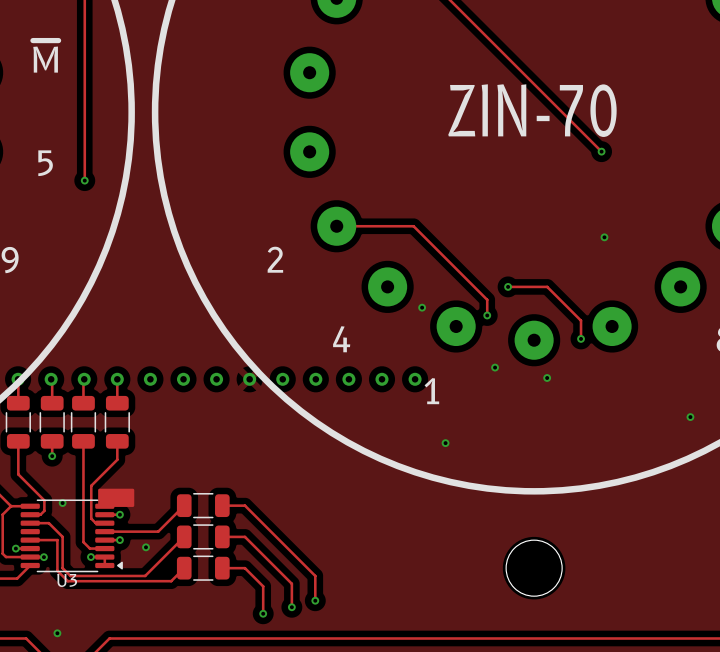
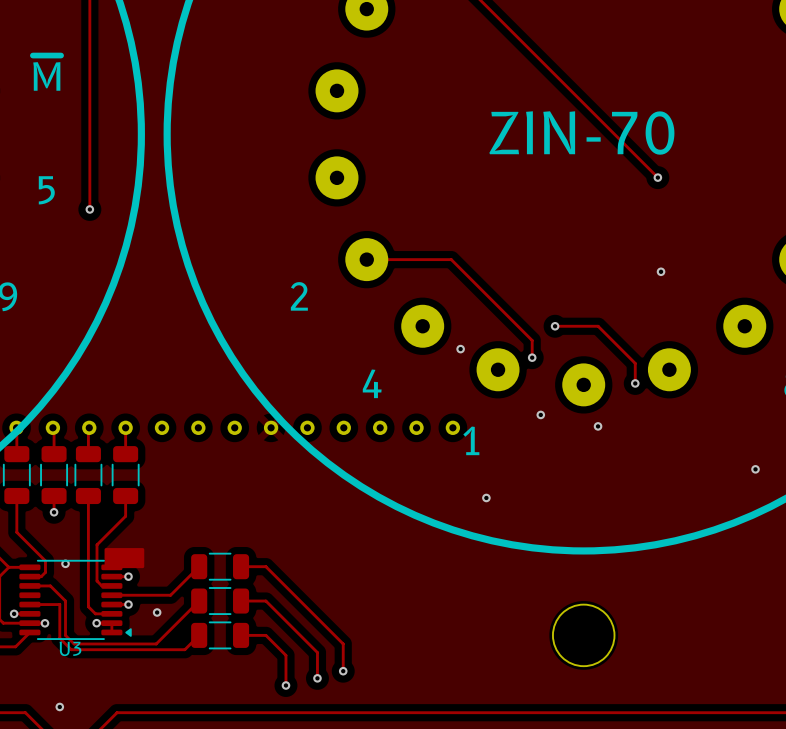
ZIN-70 text: ZIN-70 (532, 110) -> none
ZIN-70 name: none -> ZIN-70 (581, 132)

